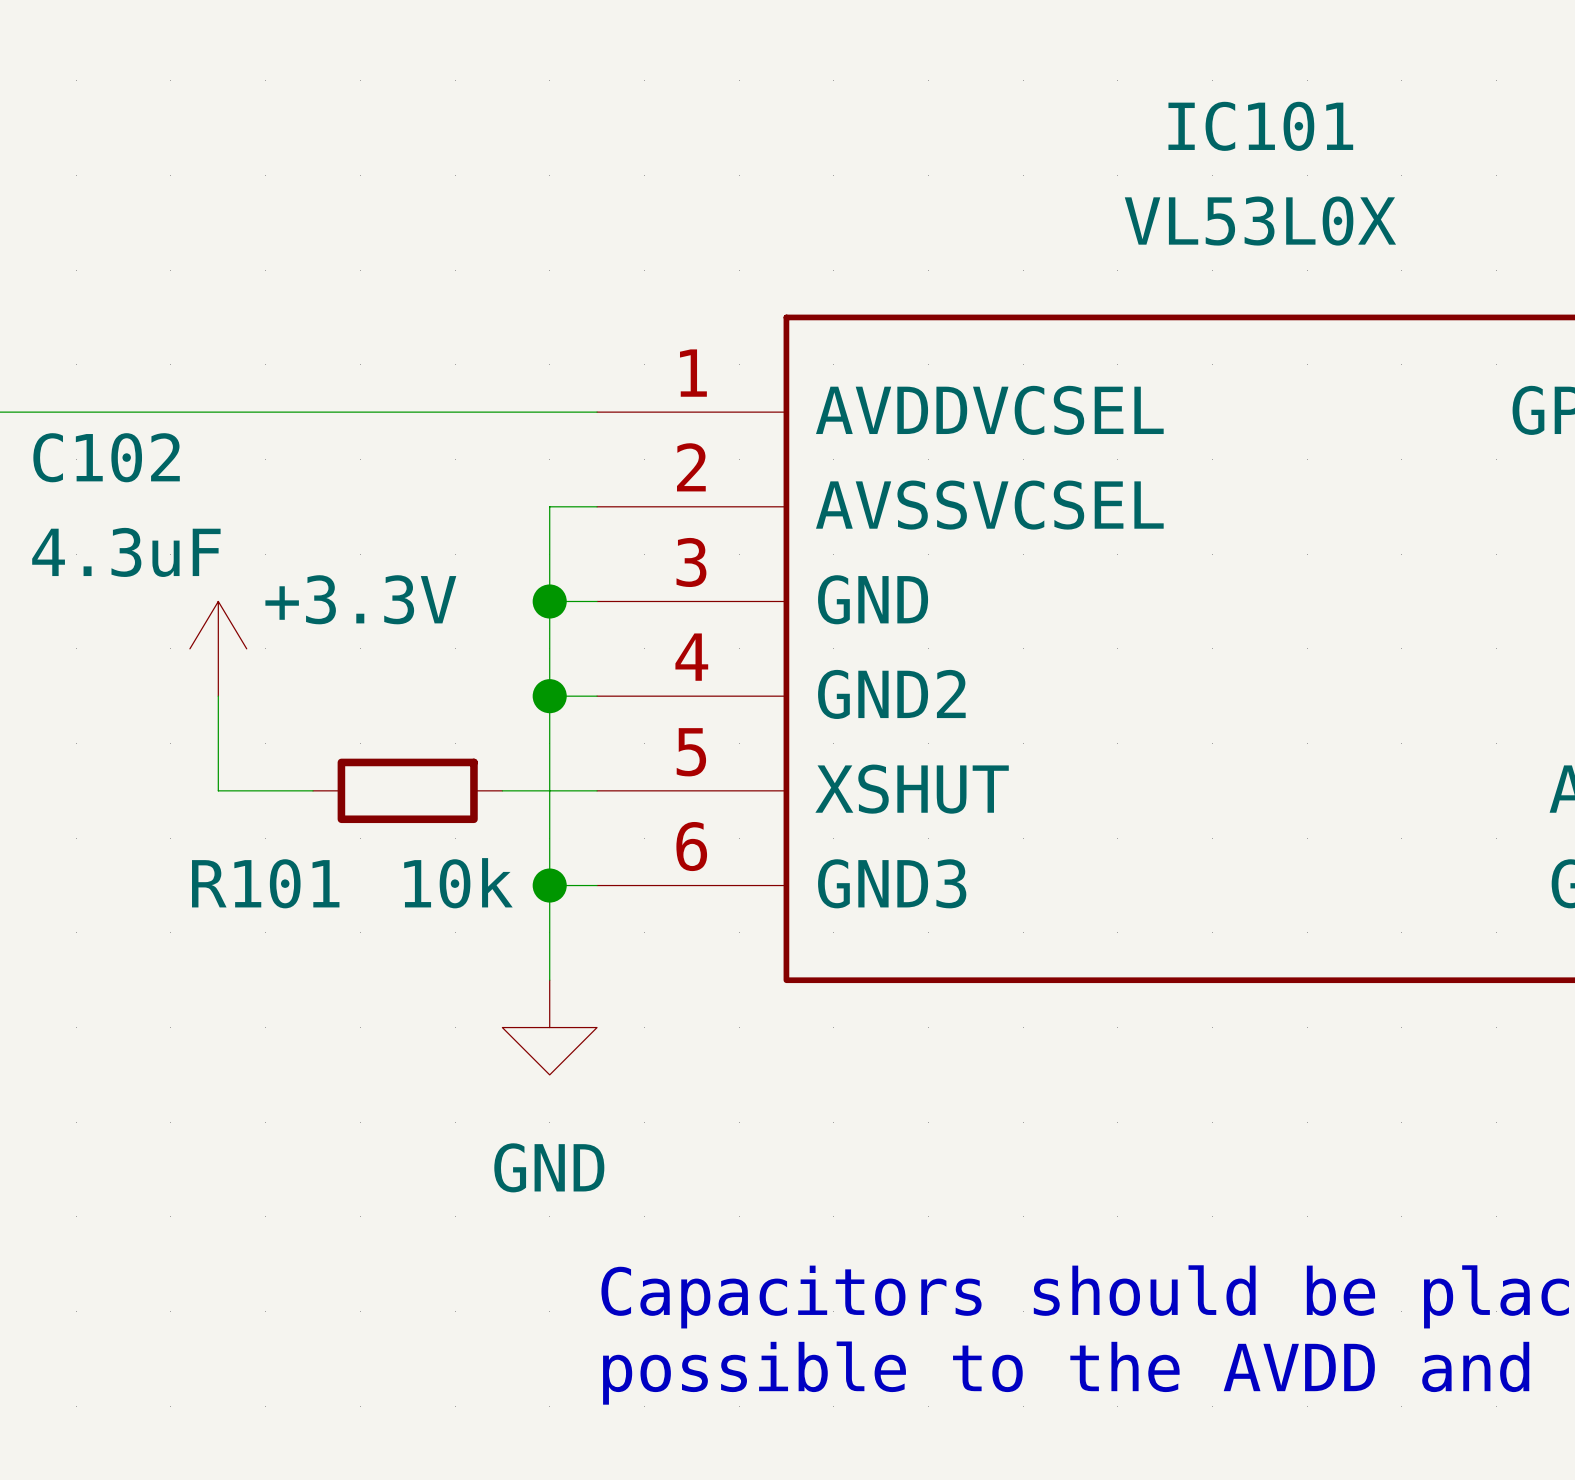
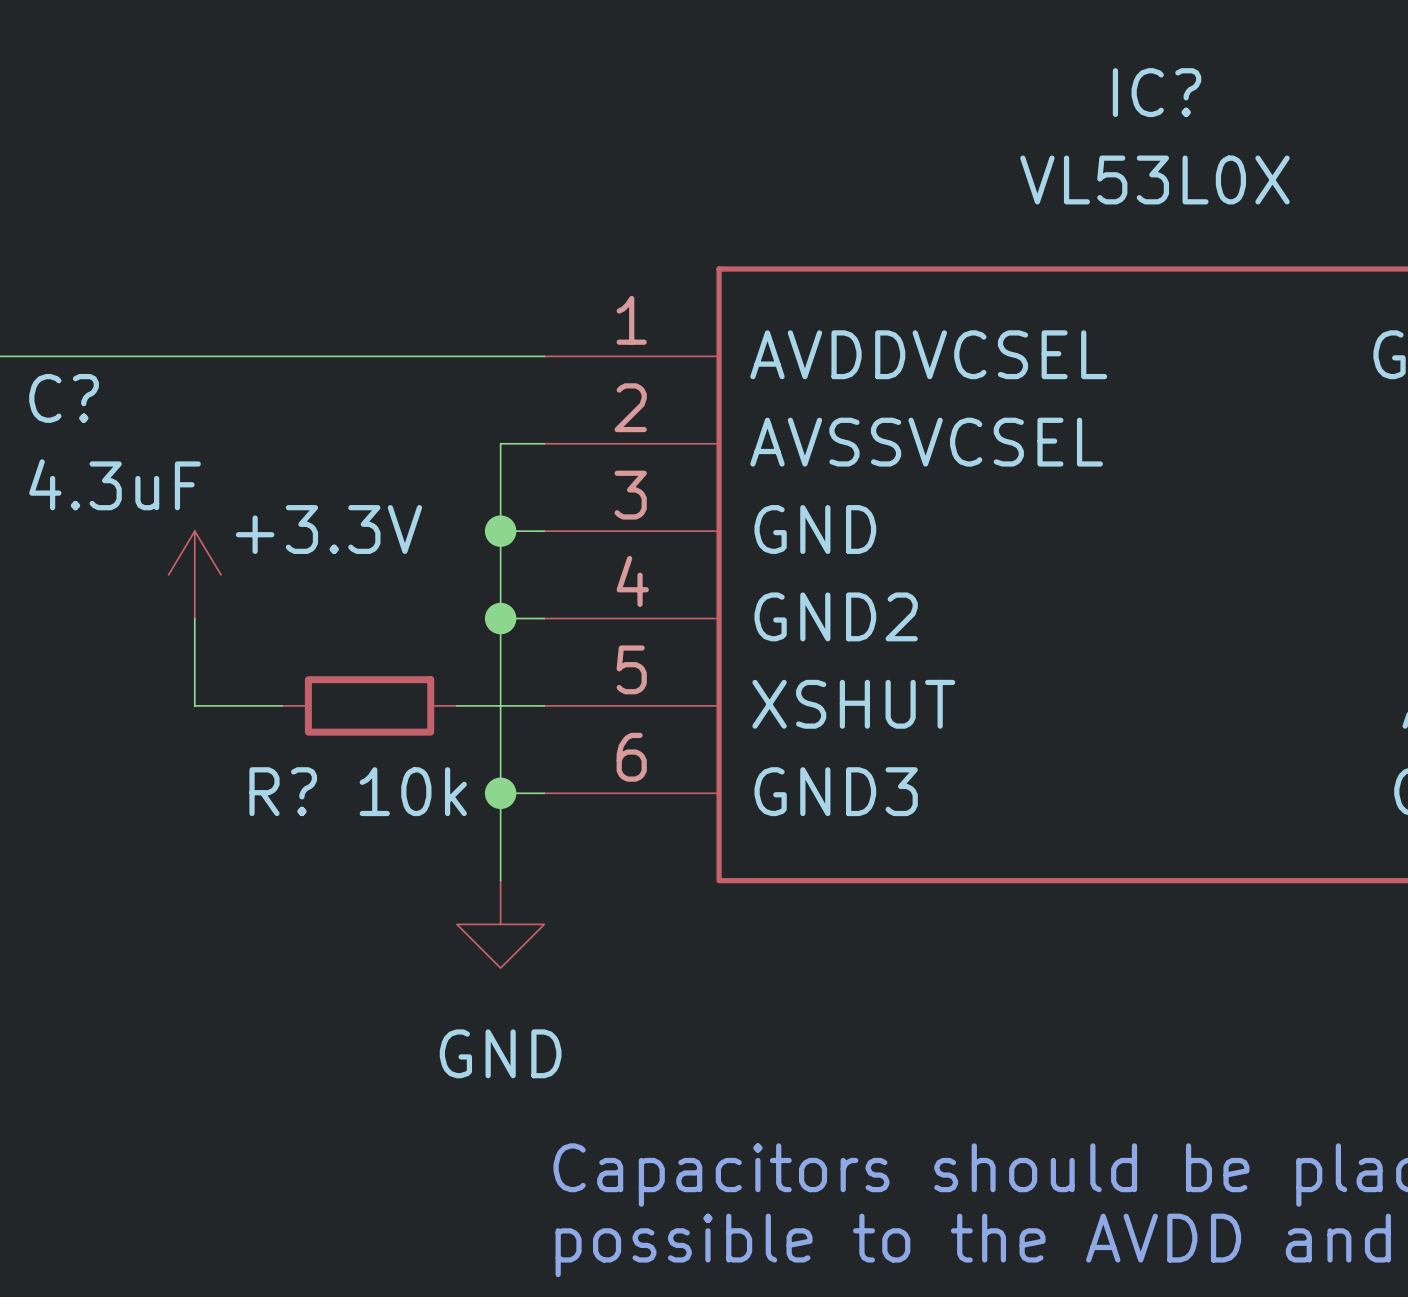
IC101 name: IC101 (1260, 126) -> IC? (1157, 92)
C102 name: C102 (106, 457) -> C? (64, 398)
R101 name: R101 (265, 883) -> R? (283, 791)

